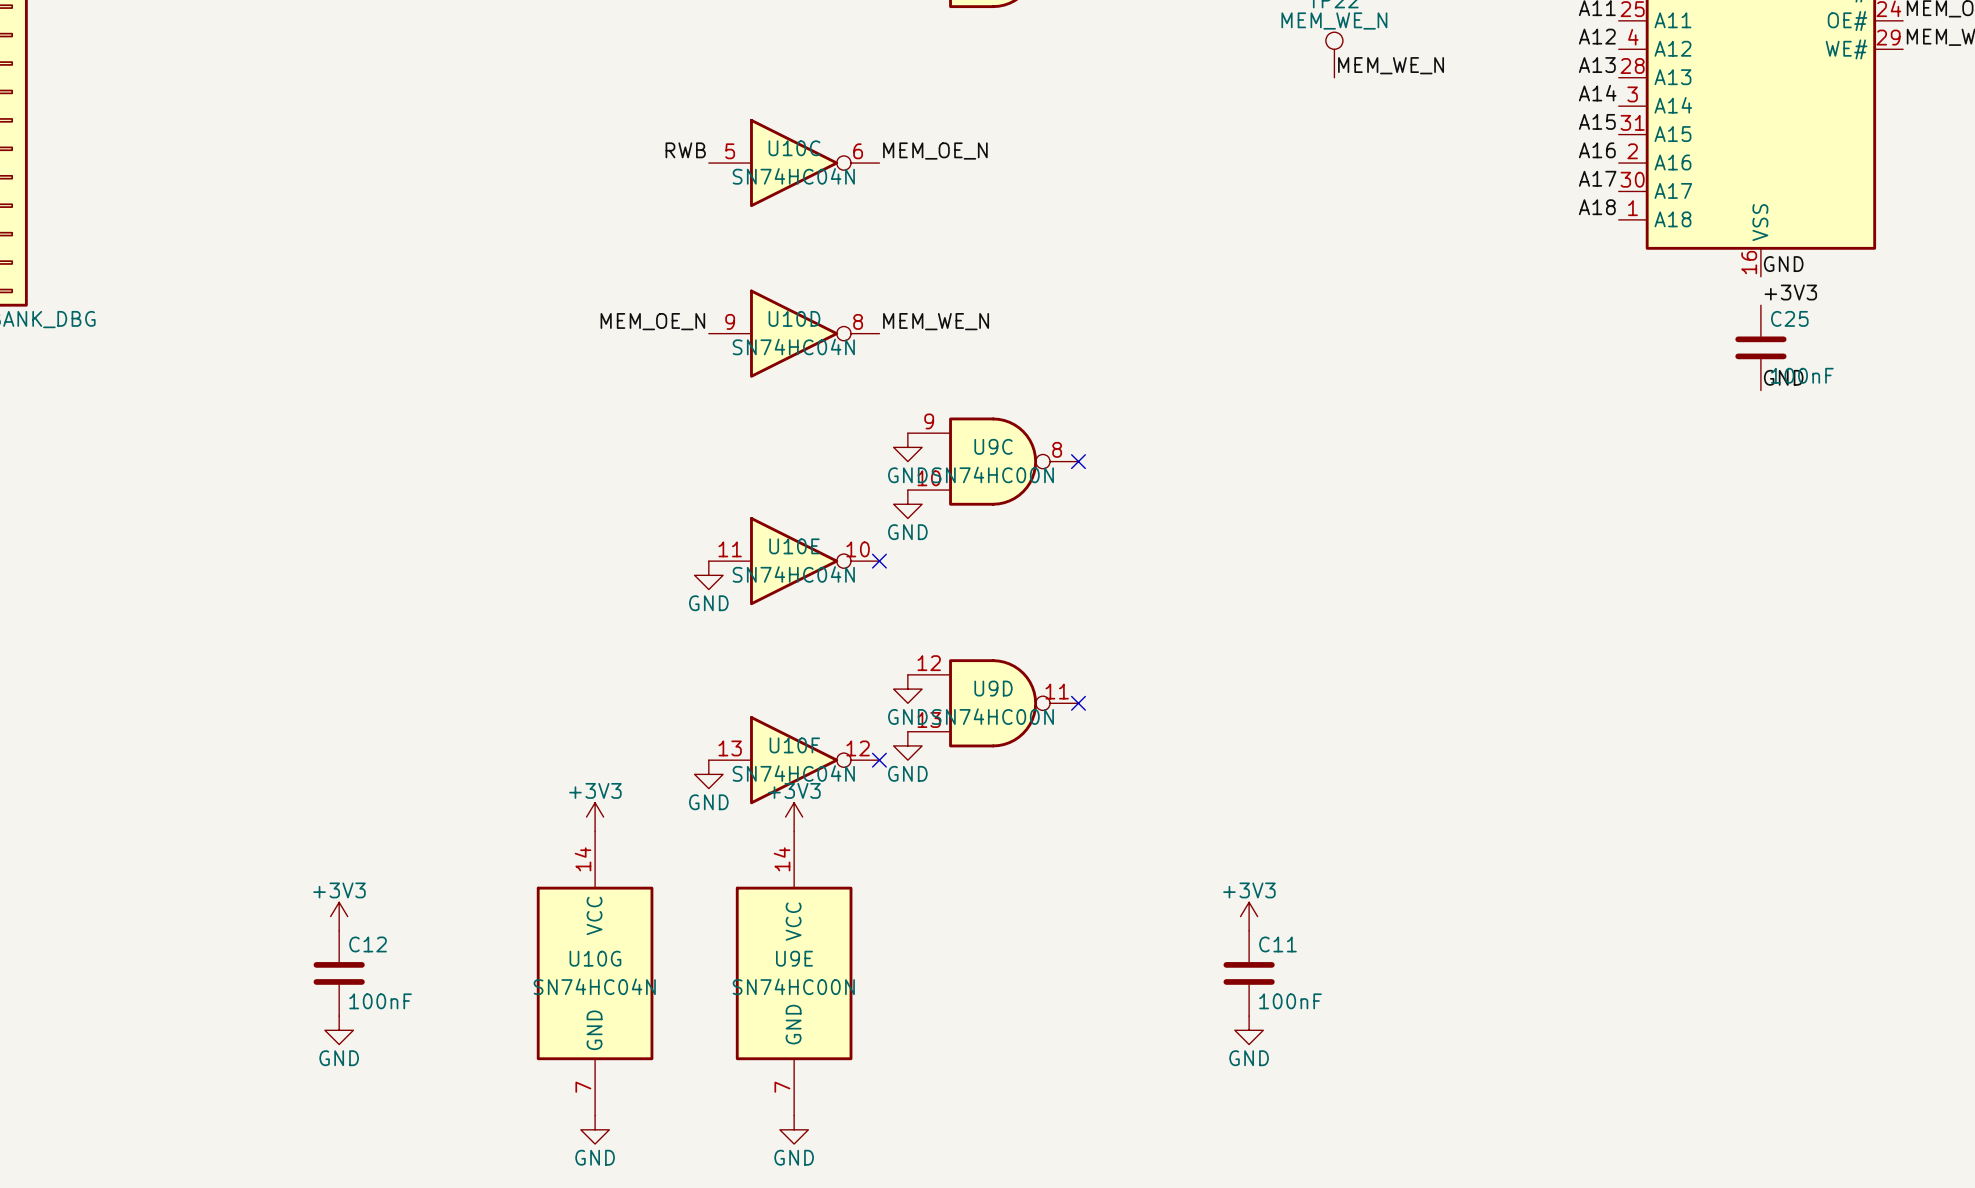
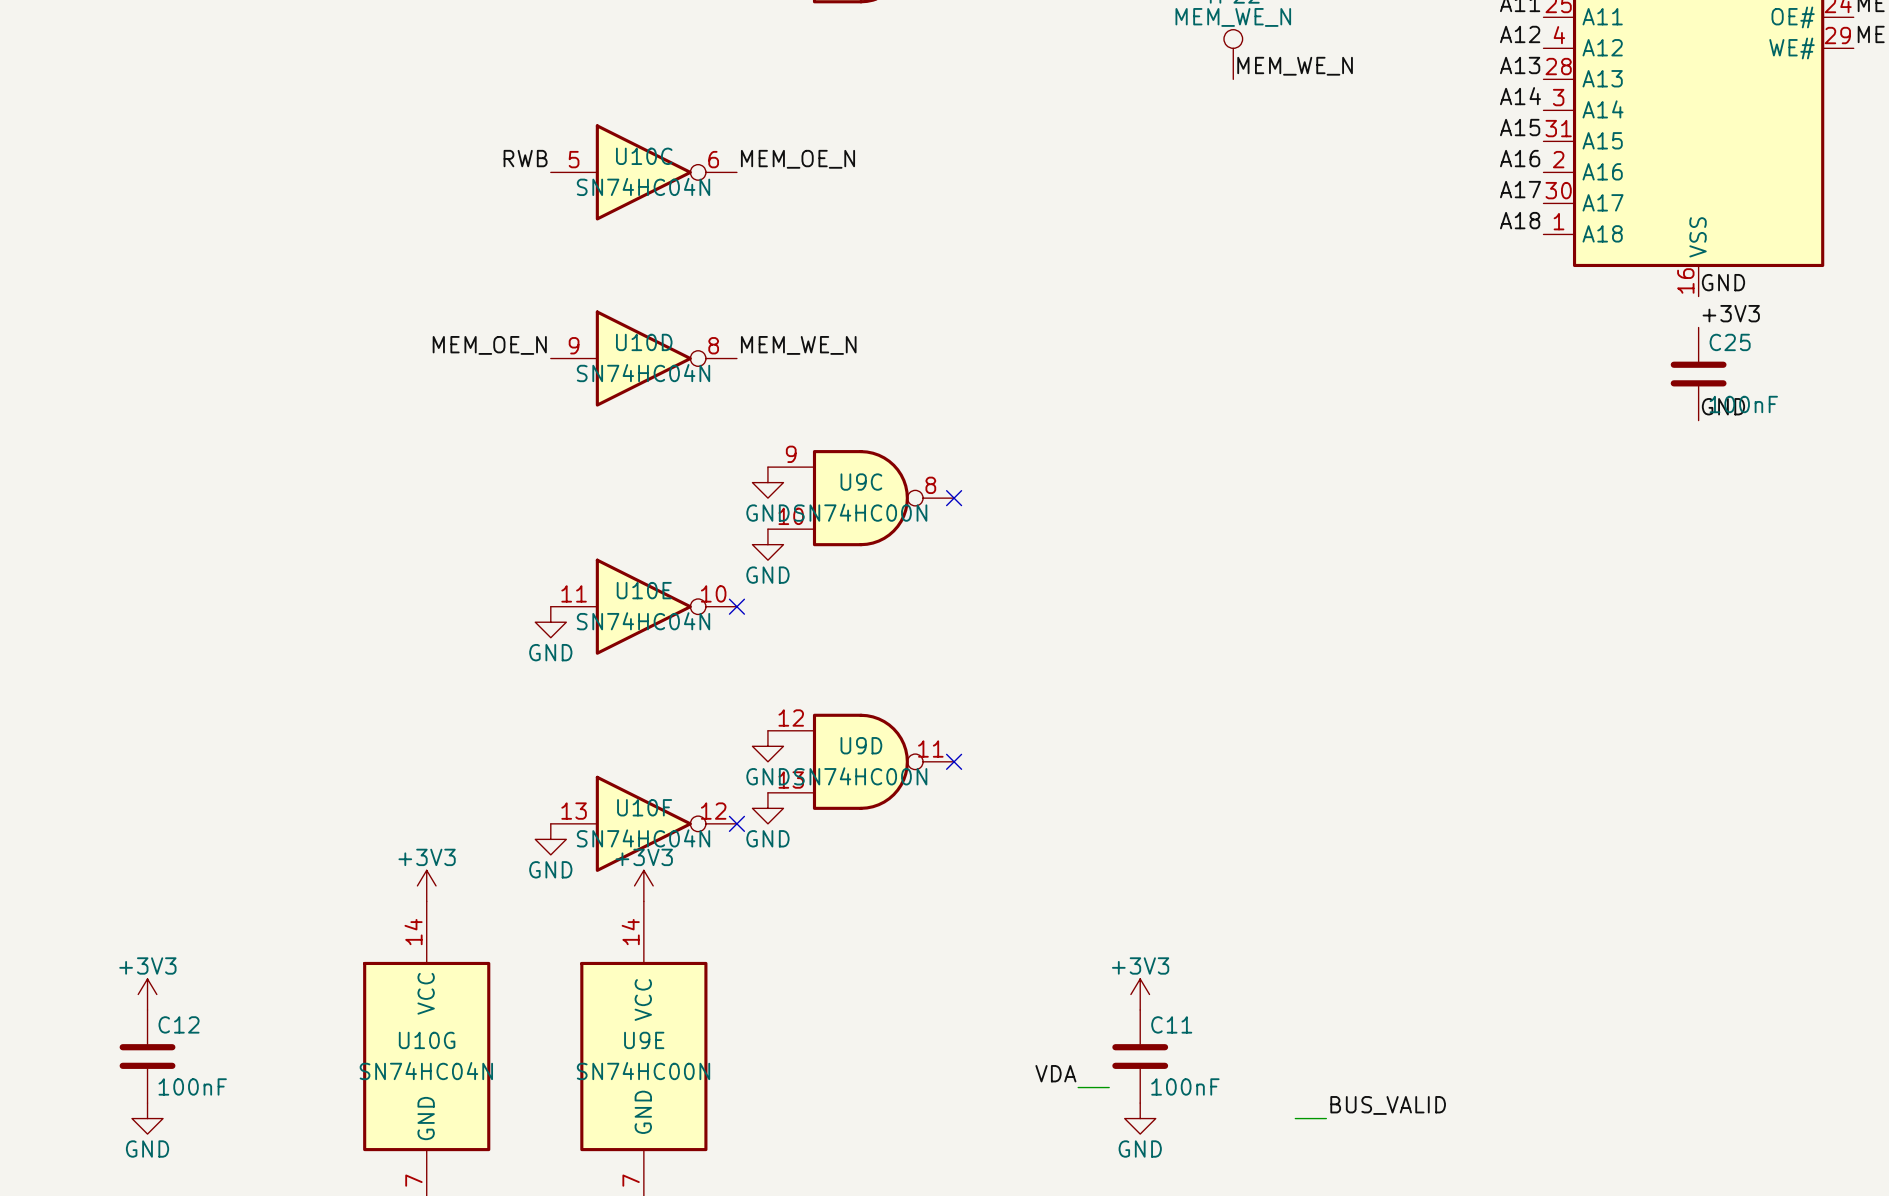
label: none -> VDA (1055, 1073)
wire: none -> (1078, 1087) (1109, 1087)
label: none -> BUS_VALID (1388, 1105)
wire: none -> (1295, 1118) (1326, 1118)

